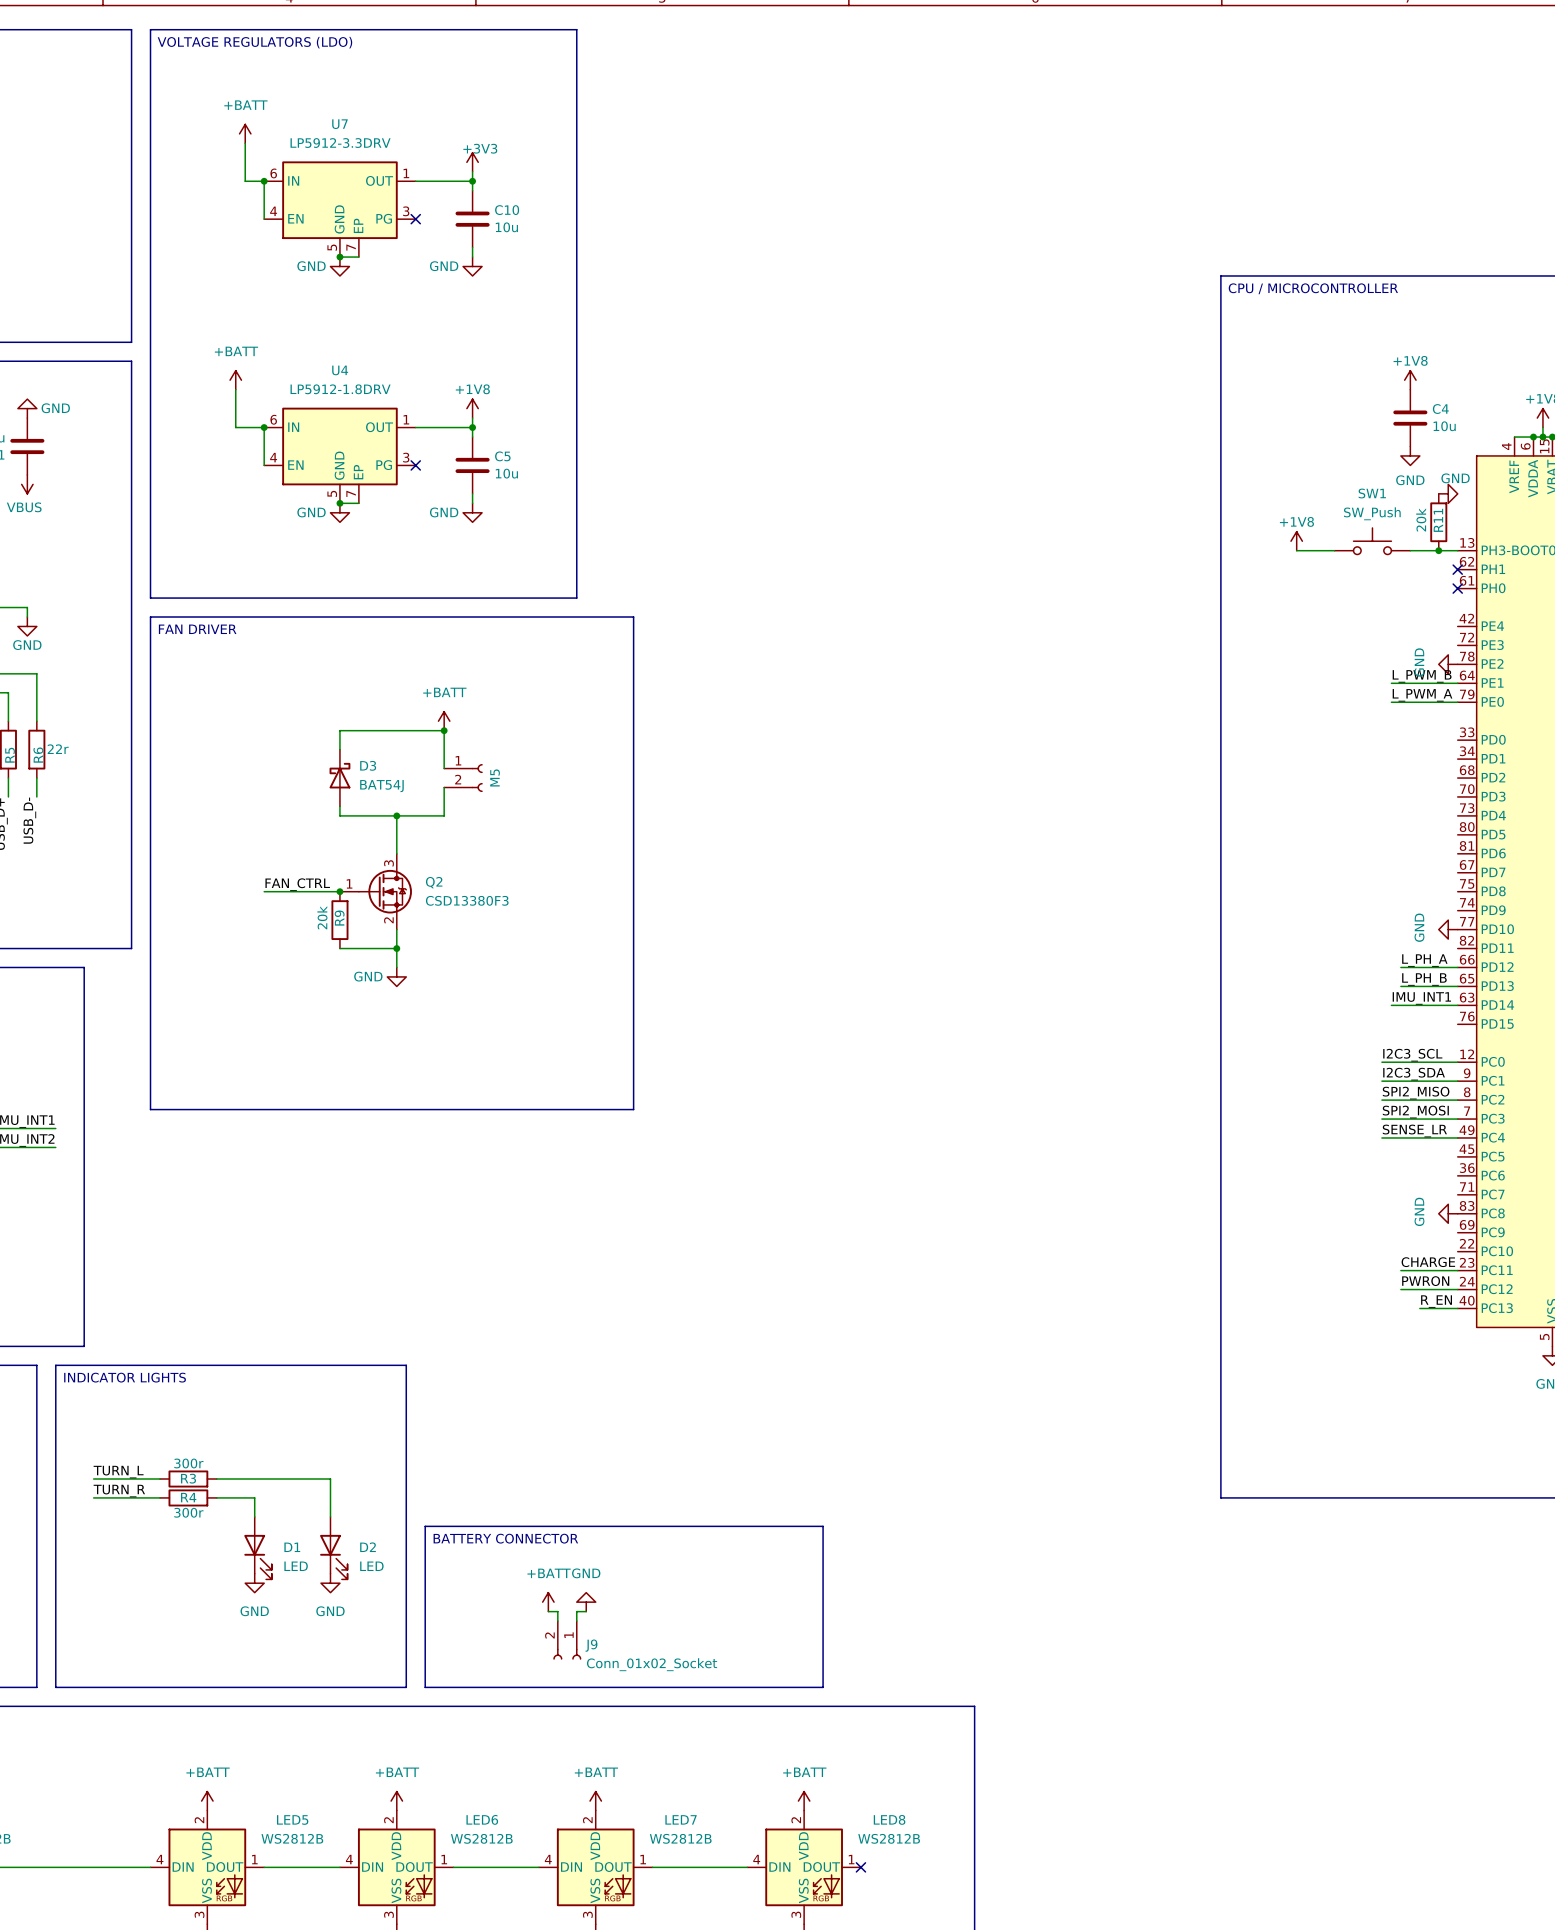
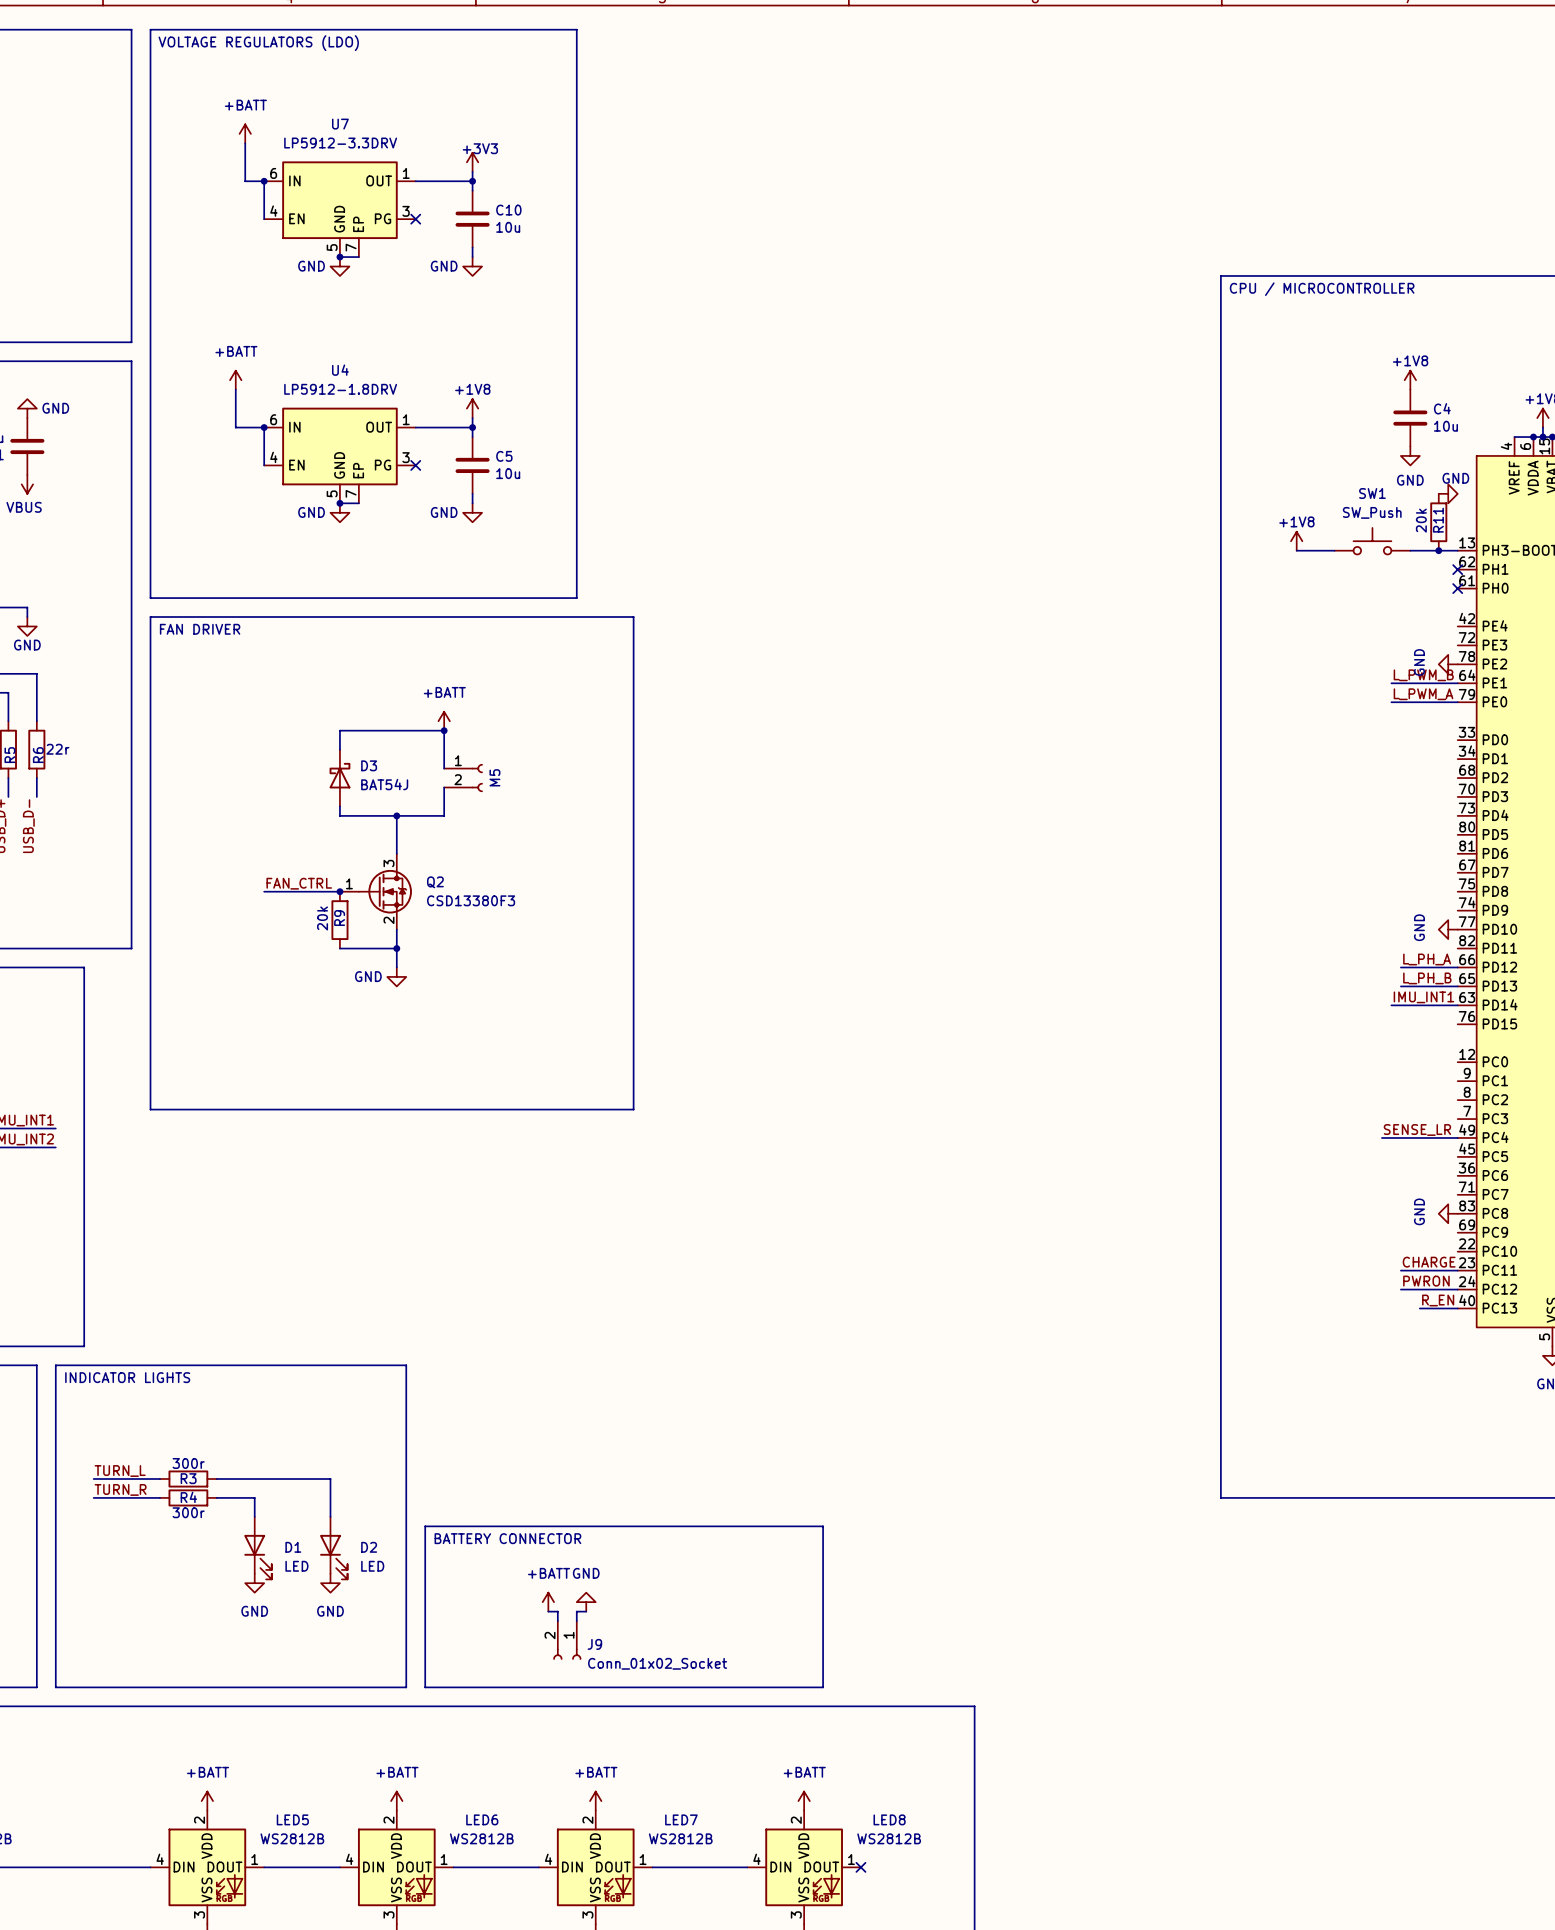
label: I2C3_SCL (1412, 1055) -> none
wire: (1381, 1062) (1457, 1062) -> none
label: I2C3_SDA (1414, 1074) -> none
wire: (1381, 1081) (1457, 1081) -> none
label: SPI2_MISO (1416, 1093) -> none
wire: (1381, 1100) (1457, 1100) -> none
label: SPI2_MOSI (1415, 1112) -> none
wire: (1381, 1119) (1457, 1119) -> none

